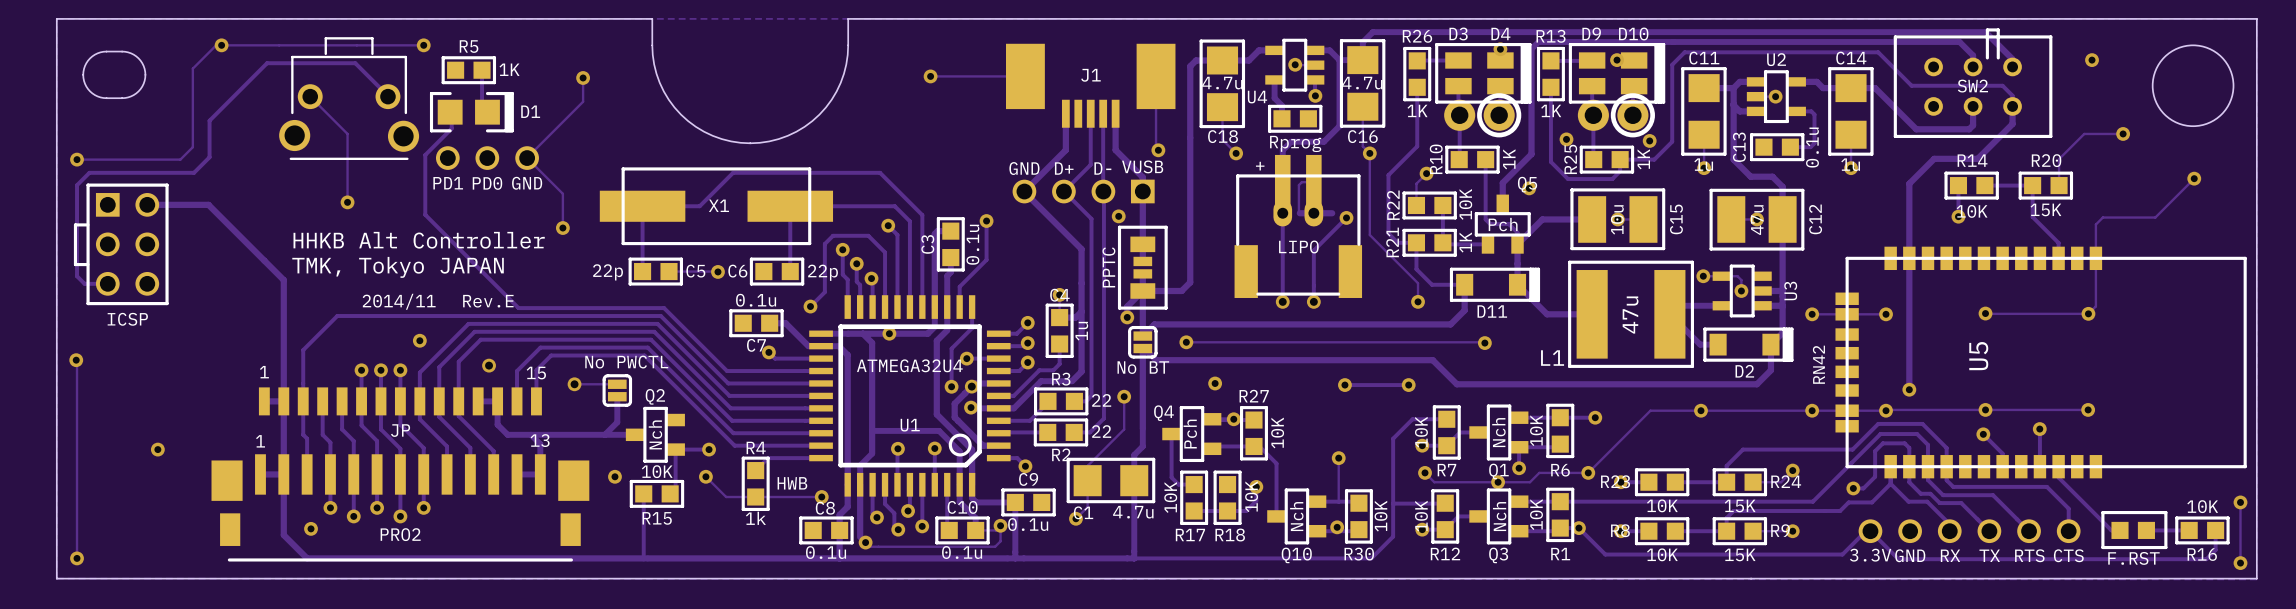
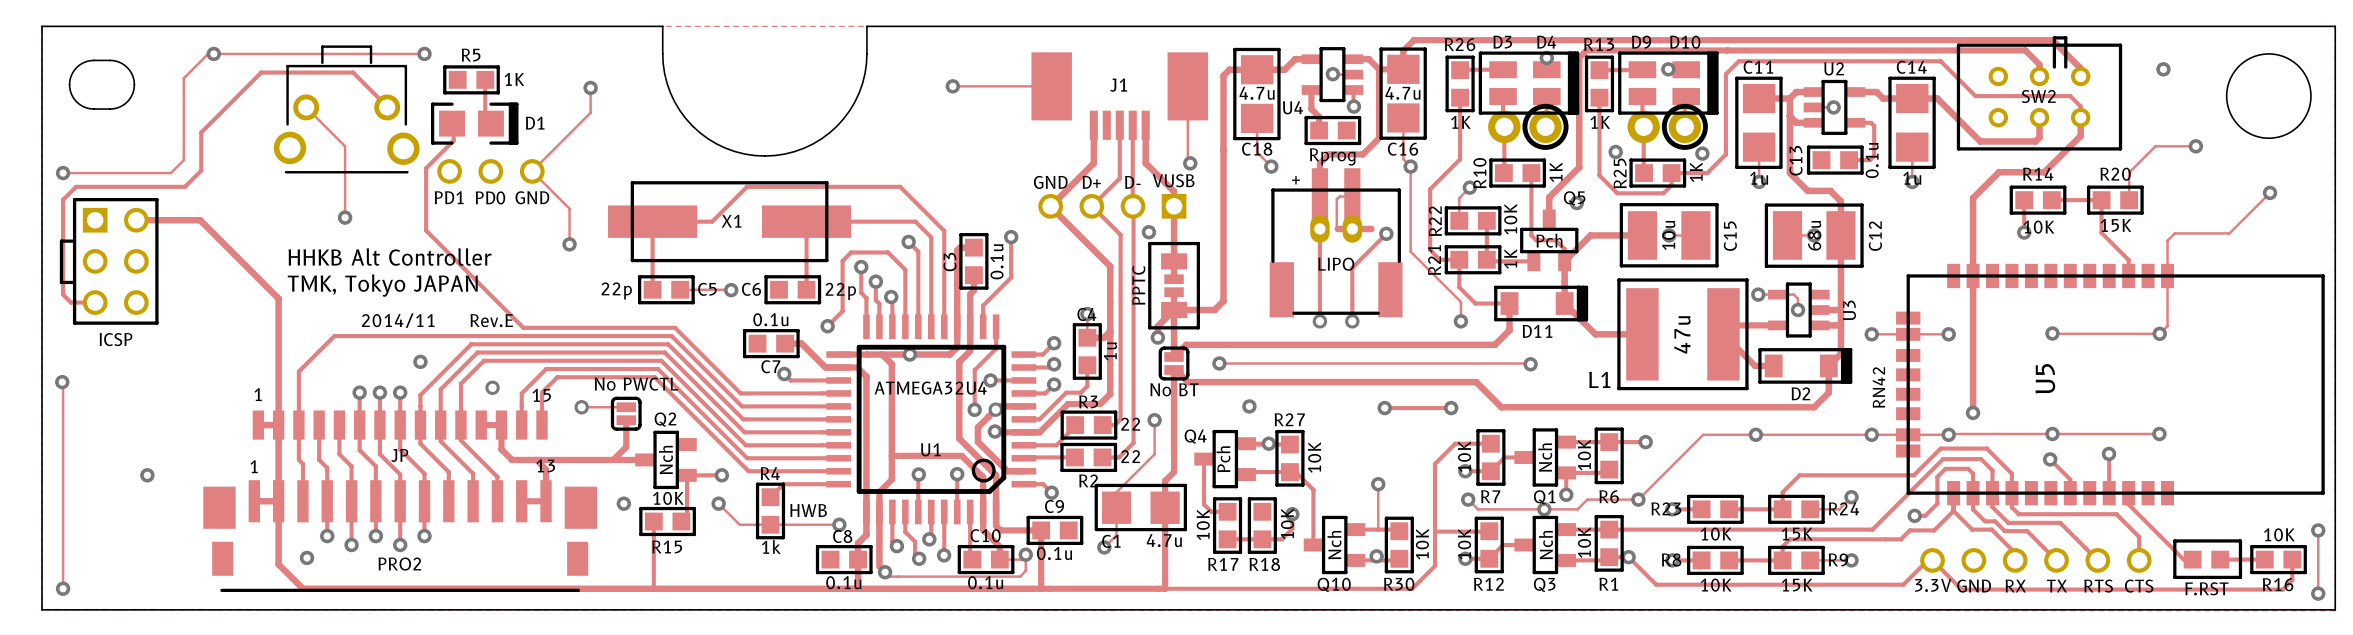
C12 value: 47u (1757, 220) -> 68u (1814, 235)

